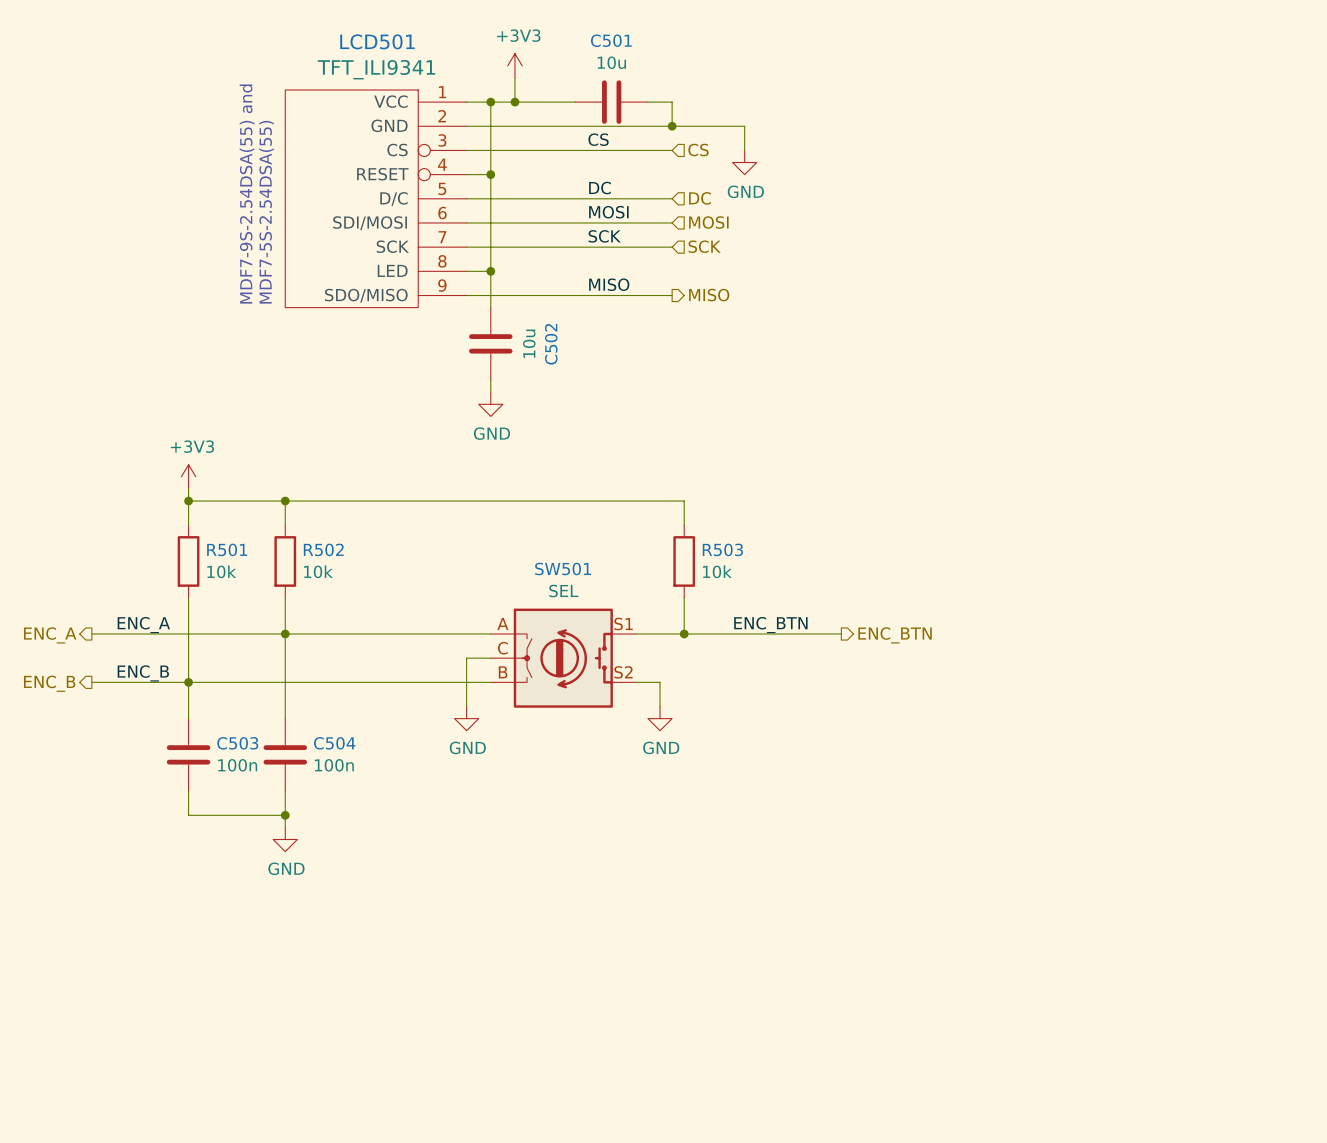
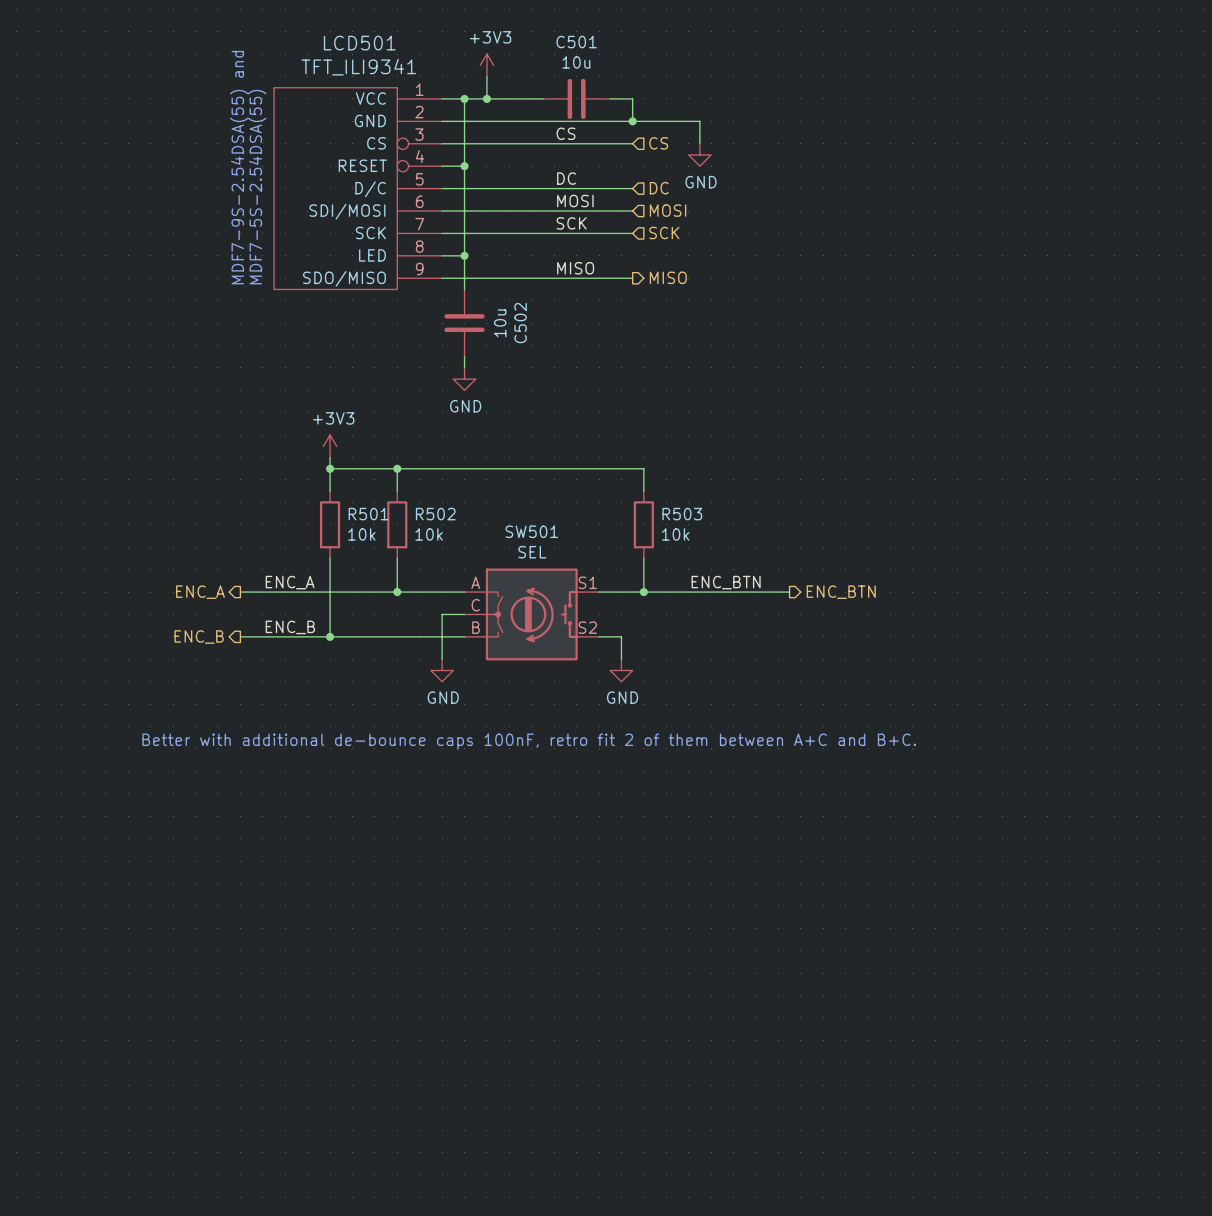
power symbol position: +3V3 (188, 476) -> +3V3 (330, 446)
wire: (188, 488) (188, 525) -> (330, 457) (330, 491)
wire: (188, 501) (345, 501) -> none
junction: (188, 501) -> none
wire: (285, 501) (285, 525) -> (397, 468) (397, 491)
junction: (285, 501) -> none
junction: none -> (330, 468)
junction: none -> (397, 468)
R501 position: (188, 561) -> (330, 524)
R502 position: (285, 561) -> (397, 524)
wire: (188, 597) (188, 718) -> none
wire: (285, 597) (285, 718) -> none
wire: none -> (330, 558) (330, 636)
label position: ENC_A (143, 625) -> ENC_A (290, 582)
wire: (91, 634) (249, 634) -> none
junction: (285, 634) -> none
junction: none -> (397, 592)
hierarchical label position: ENC_A (50, 635) -> ENC_A (200, 592)
label position: ENC_B (143, 673) -> ENC_B (290, 627)
wire: (91, 682) (249, 682) -> none
junction: (188, 682) -> none
junction: none -> (330, 636)
hierarchical label position: ENC_B (49, 683) -> ENC_B (199, 637)
C503: 100n (188, 754) -> none
C504: 100n (285, 754) -> none
wire: (188, 791) (188, 815) (285, 815) -> none
wire: (285, 791) (285, 827) -> (397, 558) (397, 592)
text: none -> Better with additional de-bounce caps 100nF, retro fit 2 of them between A+C and B+C. (529, 741)
junction: (285, 815) -> none
power symbol: GND (285, 839) -> none

